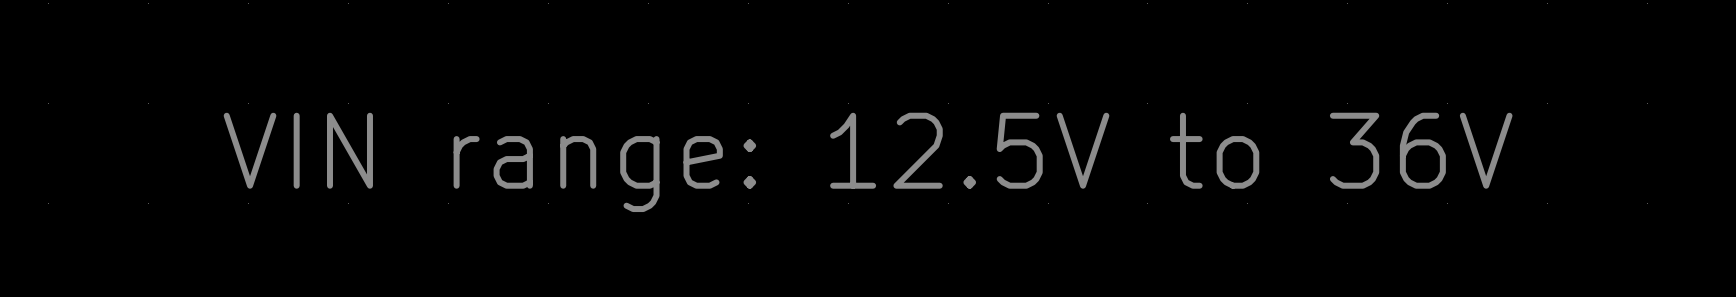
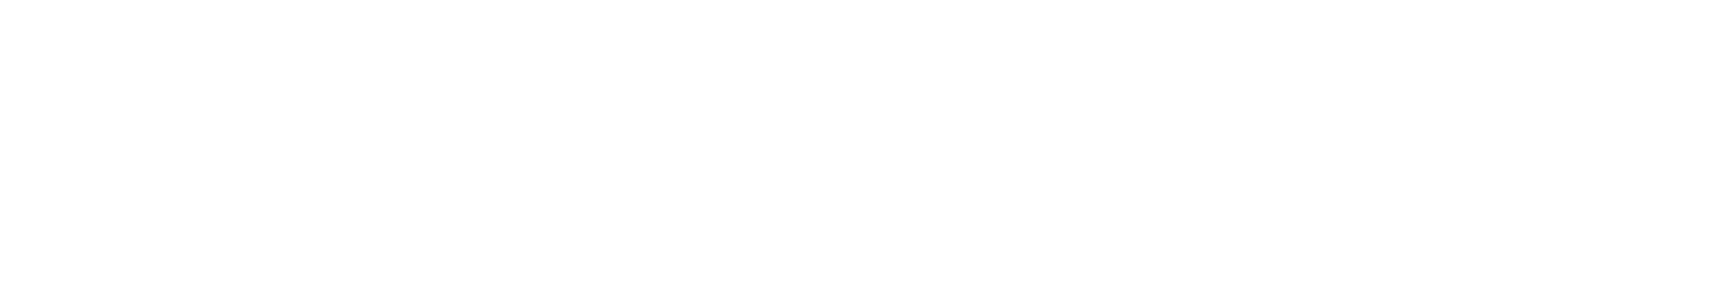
text: VIN range: 12.5V to 36V (868, 162) -> none

